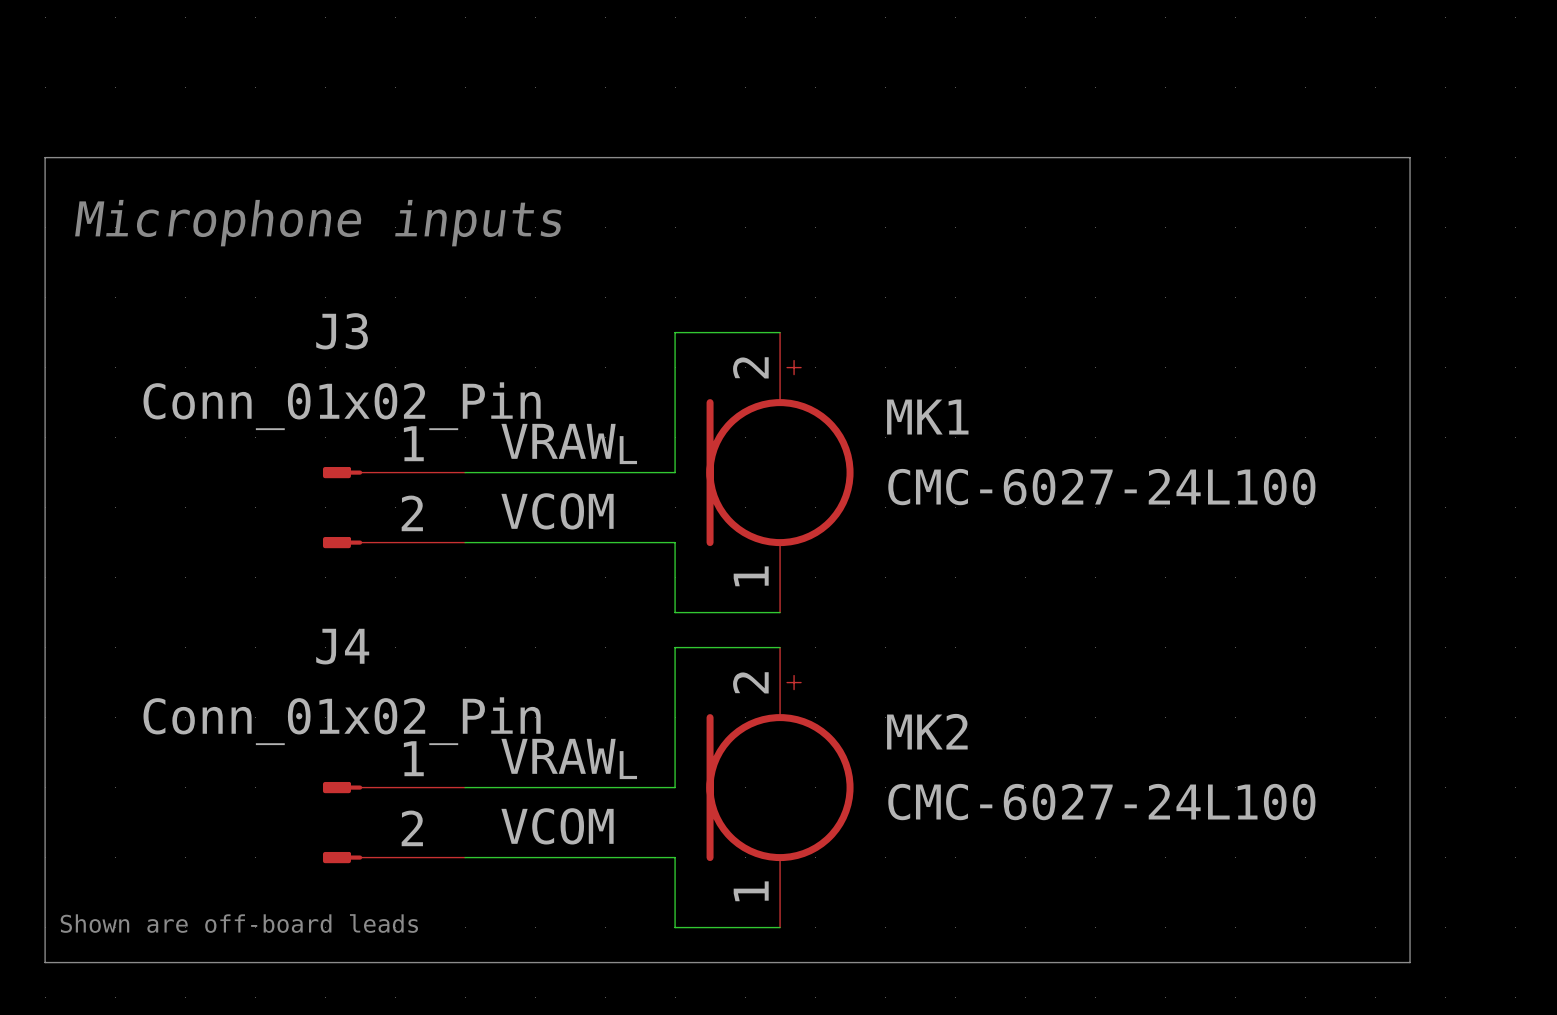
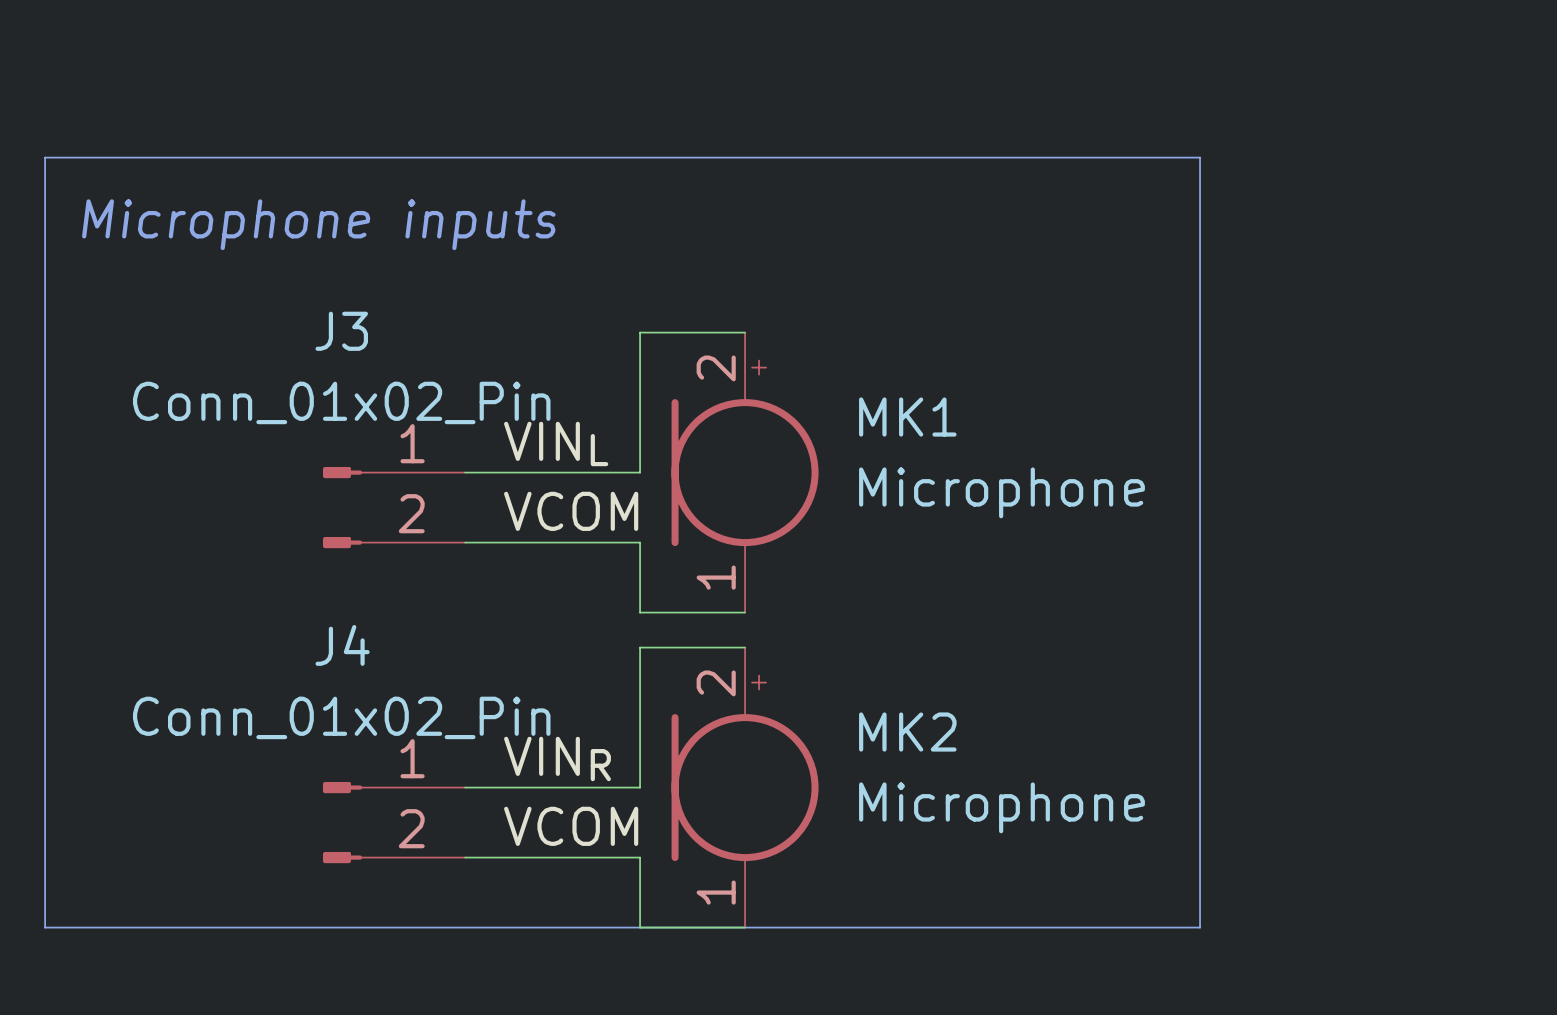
line: (1200, 157) (1410, 157) (1410, 962) (45, 962) (45, 927) -> (1200, 157) (1200, 927) (45, 927)
wire: (675, 332) (675, 472) (640, 472) -> (675, 332) (640, 332) (640, 472)
wire: (745, 332) (780, 332) -> none
label: VRAWL (569, 443) -> VINL (556, 443)
MK1 position: (780, 472) -> (745, 472)
MK1 value: CMC-6027-24L100 (1101, 487) -> Microphone (1001, 492)
wire: (640, 542) (675, 542) (675, 612) -> (640, 542) (640, 612) (675, 612)
wire: (745, 612) (780, 612) -> none
wire: (675, 647) (675, 787) (640, 787) -> (675, 647) (640, 647) (640, 787)
wire: (745, 647) (780, 647) -> none
label: VRAWL (569, 758) -> VINR (557, 758)
MK2 position: (780, 787) -> (745, 787)
MK2 value: CMC-6027-24L100 (1101, 802) -> Microphone (1001, 807)
wire: (640, 857) (675, 857) (675, 927) -> (640, 857) (640, 927) (675, 927)
text: Shown are off-board leads (239, 923) -> none

